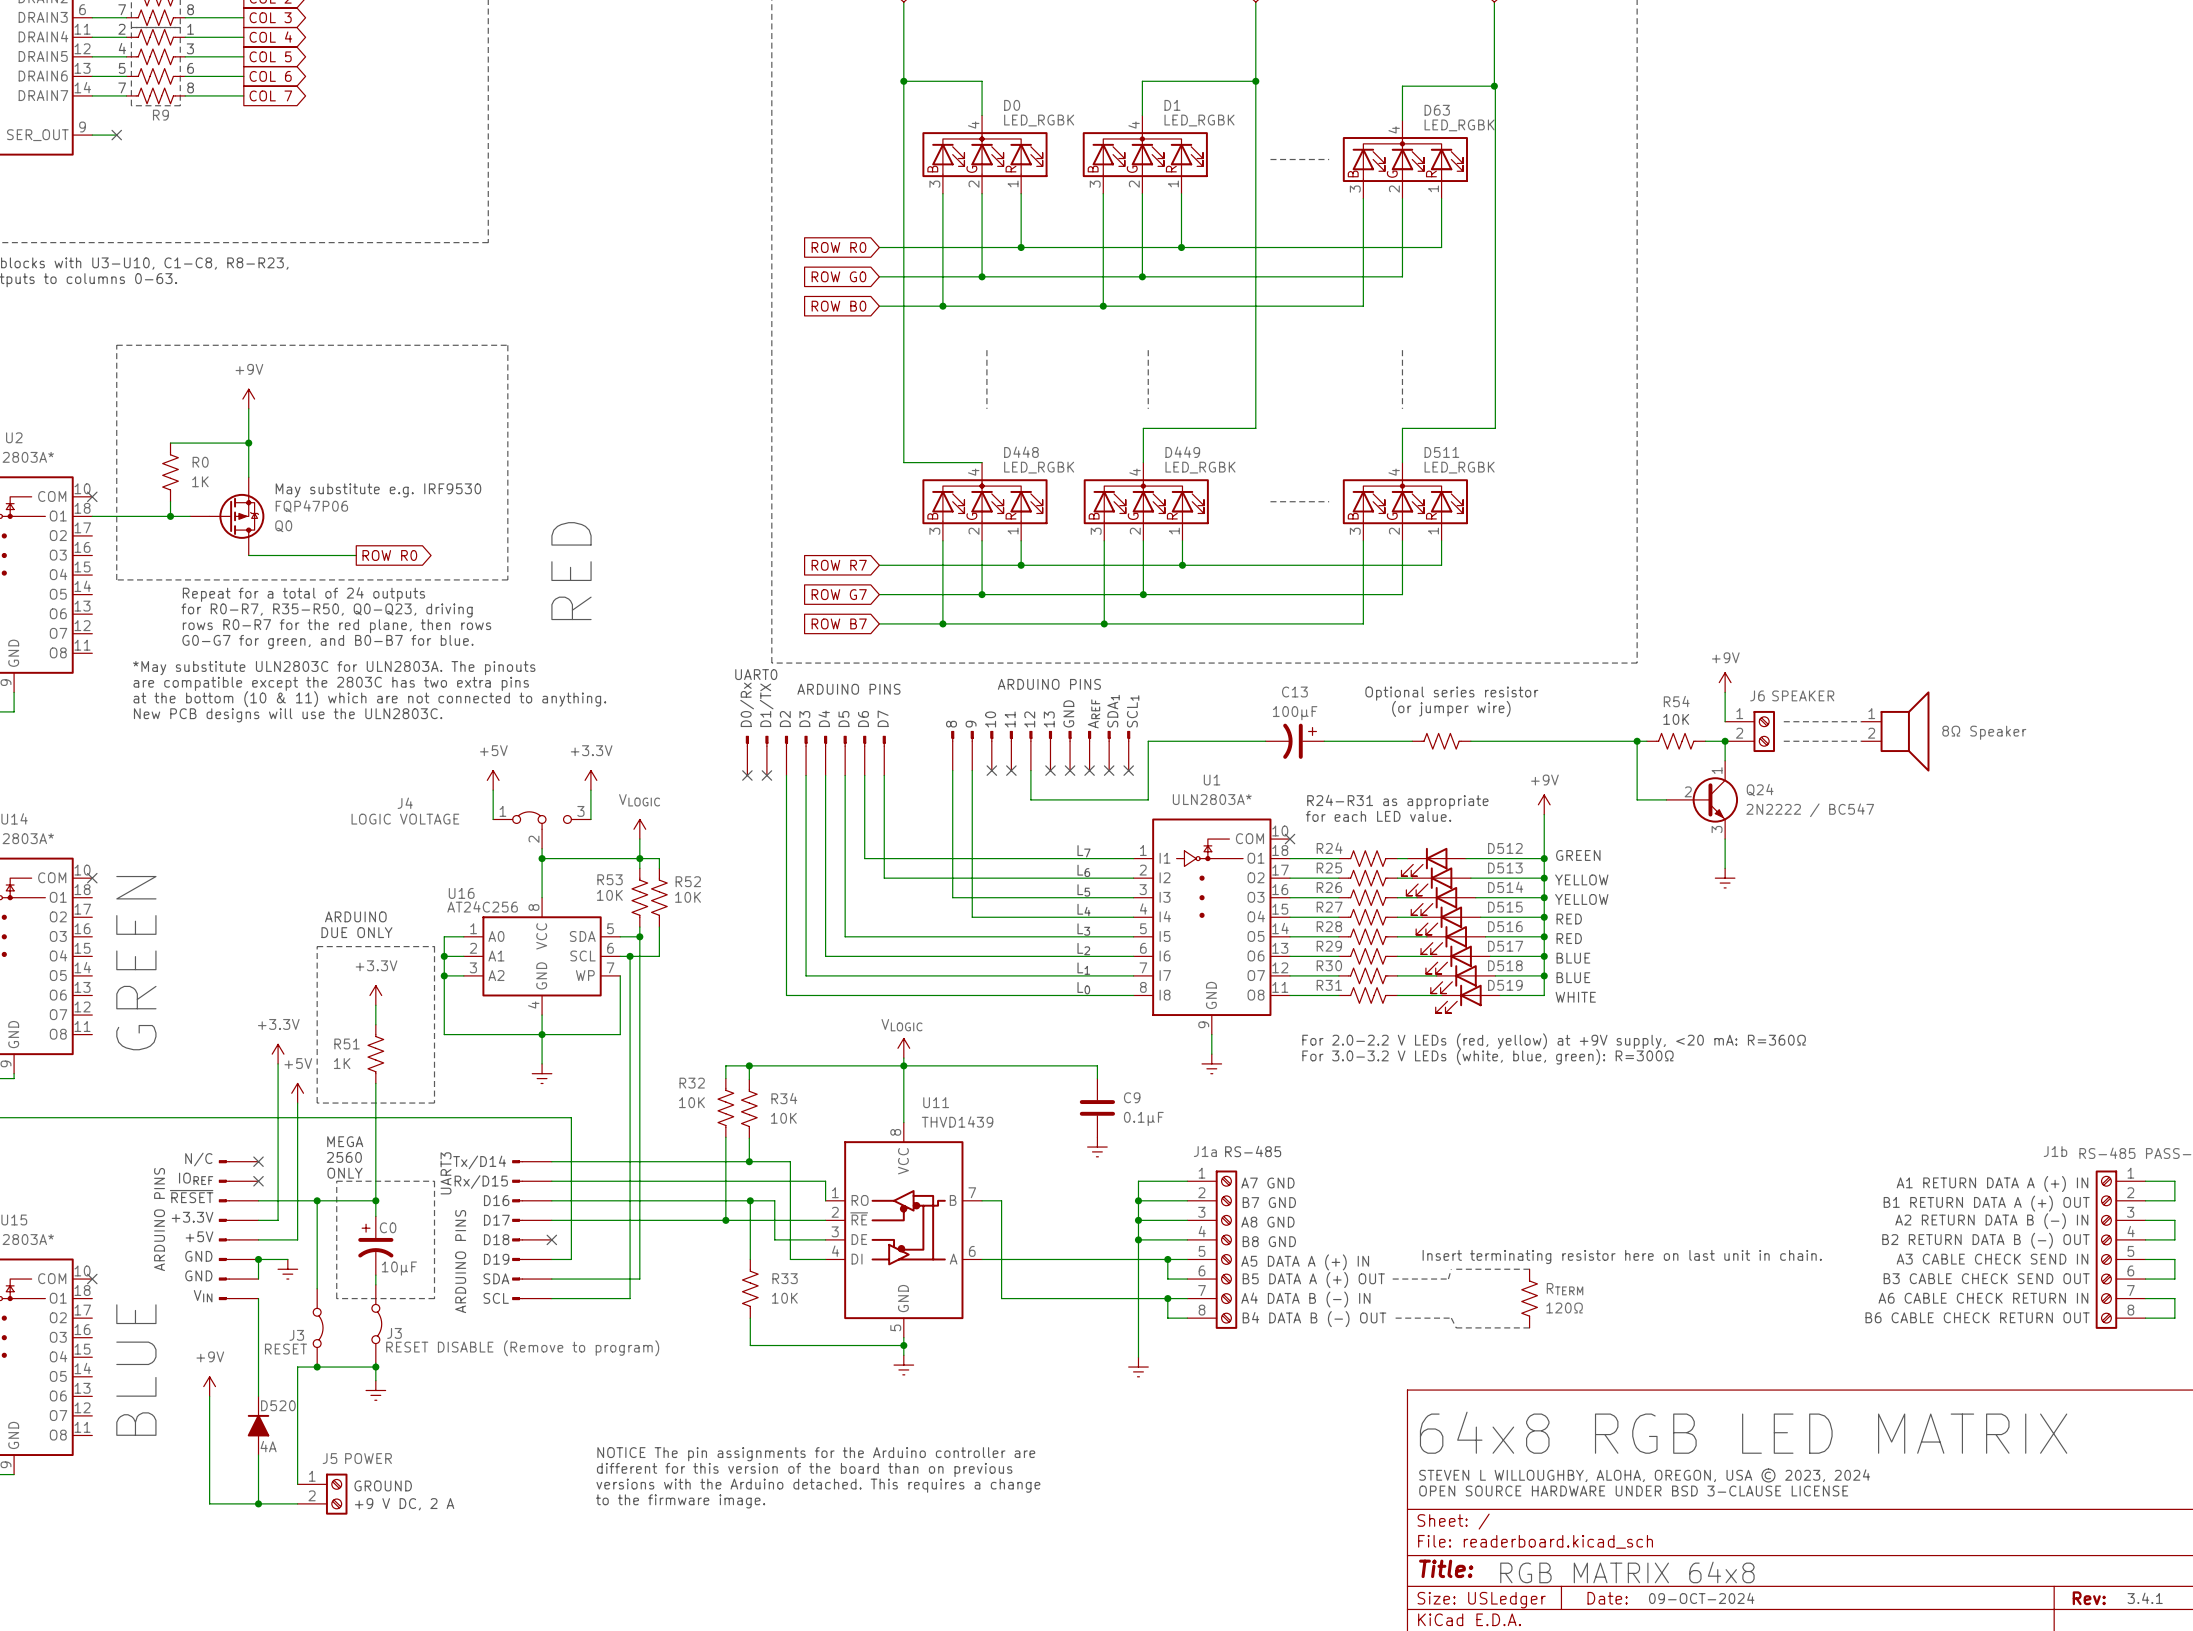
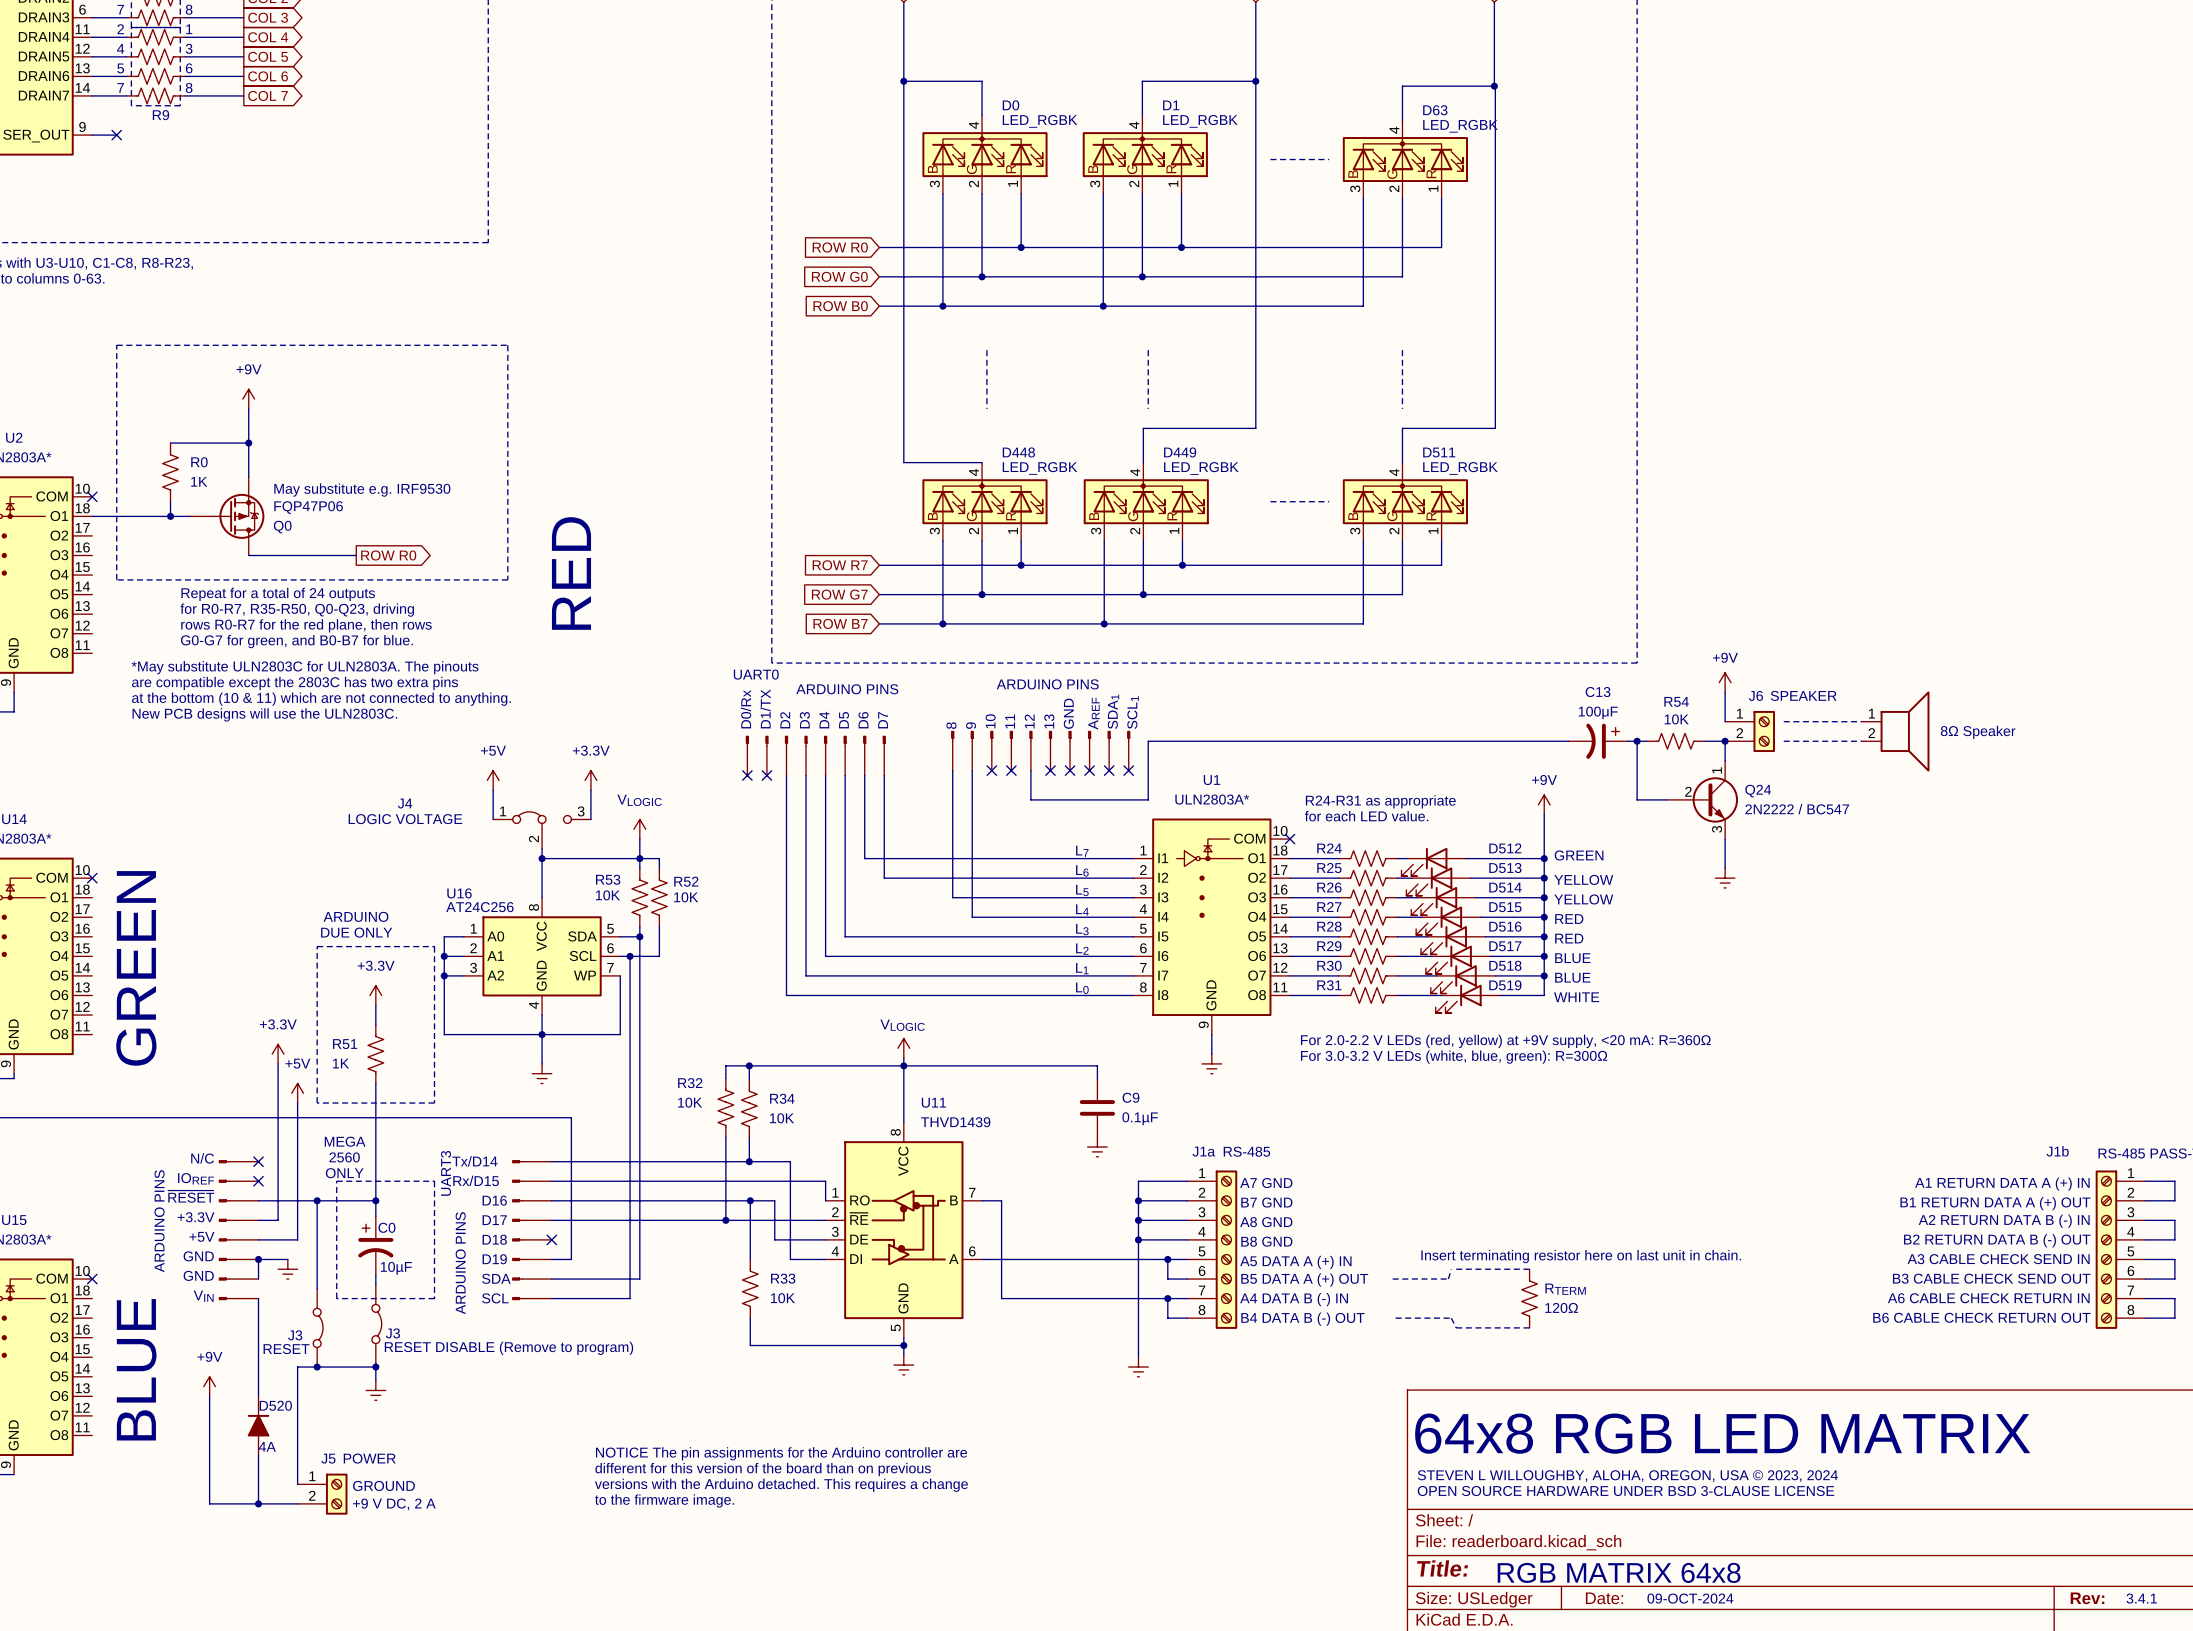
text: Optional series resistor (1451, 693) -> none
text: (or jumper wire) (1451, 708) -> none
C13 position: (1294, 741) -> (1598, 741)
part: (1441, 741) -> none

